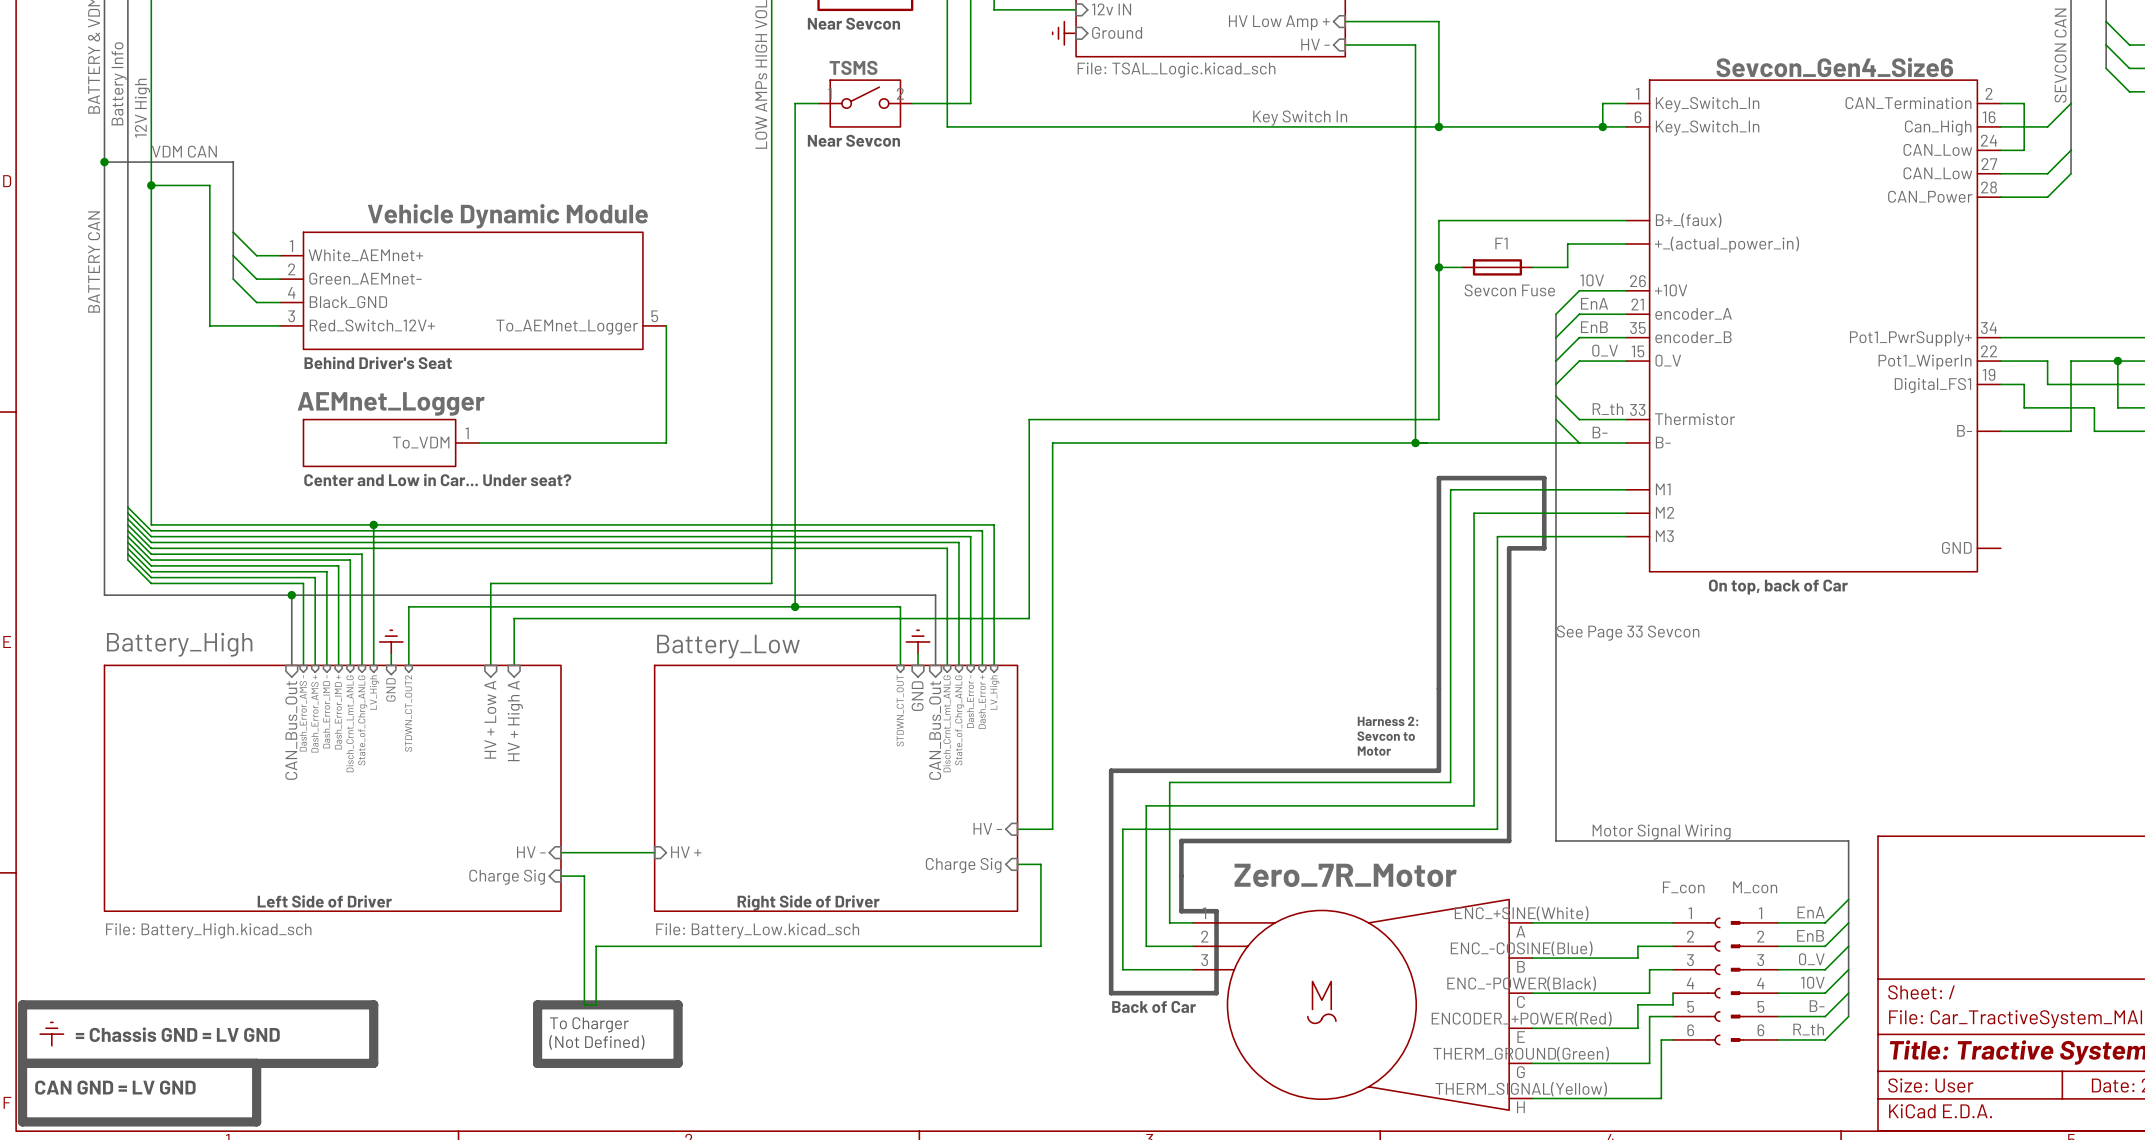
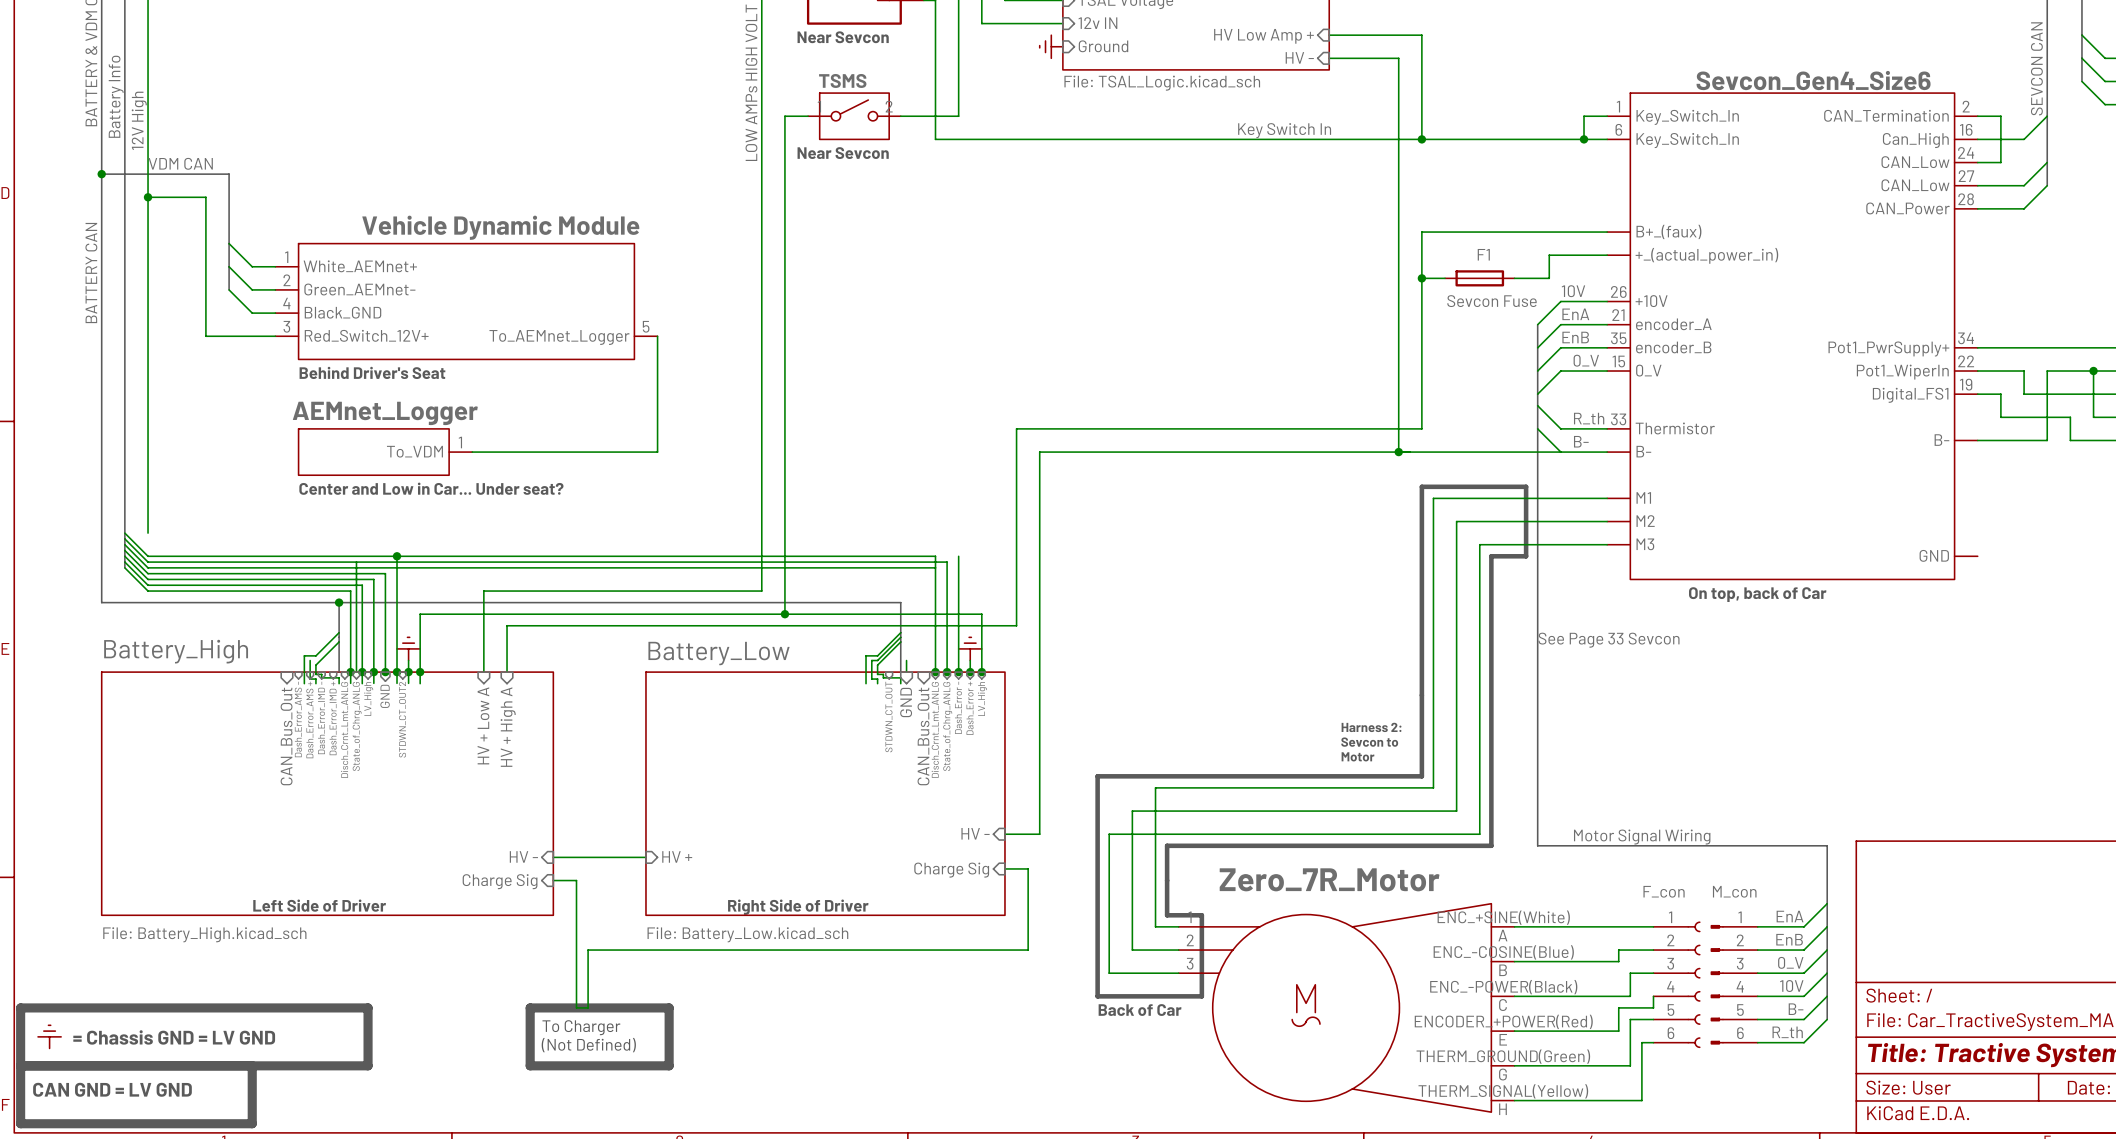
wire: (127, 507) (151, 530) (982, 530) (982, 653) -> none
wire: (127, 513) (151, 536) (970, 536) (970, 548) -> none
wire: (127, 519) (151, 542) (958, 542) (958, 554) -> (356, 562) (947, 562)
wire: (151, 524) (994, 524) (994, 606) -> none
wire: (373, 524) (373, 665) -> none
junction position: (373, 524) -> (397, 556)
wire: none -> (397, 556) (397, 683)
wire: (350, 560) (350, 665) -> (344, 567) (935, 567)
wire: (338, 565) (338, 665) -> (333, 573) (385, 573) (385, 660)
wire: (326, 571) (326, 665) -> (321, 579) (373, 579) (373, 683)
wire: (315, 577) (315, 653) -> (310, 585) (362, 585) (362, 683)
wire: (303, 583) (303, 665) -> (298, 591) (350, 591) (350, 683)
bus: (291, 595) (291, 665) -> (339, 602) (339, 672)
junction: (291, 595) -> none
junction: none -> (339, 602)
bus: (912, 595) (935, 595) (935, 665) -> (900, 602) (900, 672)
wire: (426, 606) (408, 606) (408, 665) -> (420, 614) (420, 683)
wire: (900, 606) (900, 665) -> (889, 614) (981, 614)
wire: none -> (339, 632) (315, 655) (304, 655) (304, 683)
wire: none -> (900, 632) (877, 655) (866, 655) (866, 683)
wire: none -> (900, 637) (877, 660) (871, 660) (871, 679) (877, 679) (877, 683)
wire: none -> (339, 641) (315, 665) (315, 674) (321, 674) (321, 677) (339, 677) (339, 683)
wire: none -> (900, 641) (877, 665) (877, 674) (883, 674) (883, 677) (900, 677) (900, 683)
power symbol position: (391, 641) -> (408, 648)
power symbol position: (918, 641) -> (970, 648)
wire: none -> (408, 660) (408, 683)
wire: none -> (310, 672) (310, 679) (315, 679) (315, 683)
junction: none -> (350, 672)
junction: none -> (362, 672)
junction: none -> (373, 672)
junction: none -> (385, 672)
junction: none -> (397, 672)
junction: none -> (408, 672)
junction: none -> (420, 672)
junction: none -> (935, 672)
junction: none -> (947, 672)
junction: none -> (958, 672)
junction: none -> (970, 672)
junction: none -> (981, 672)

